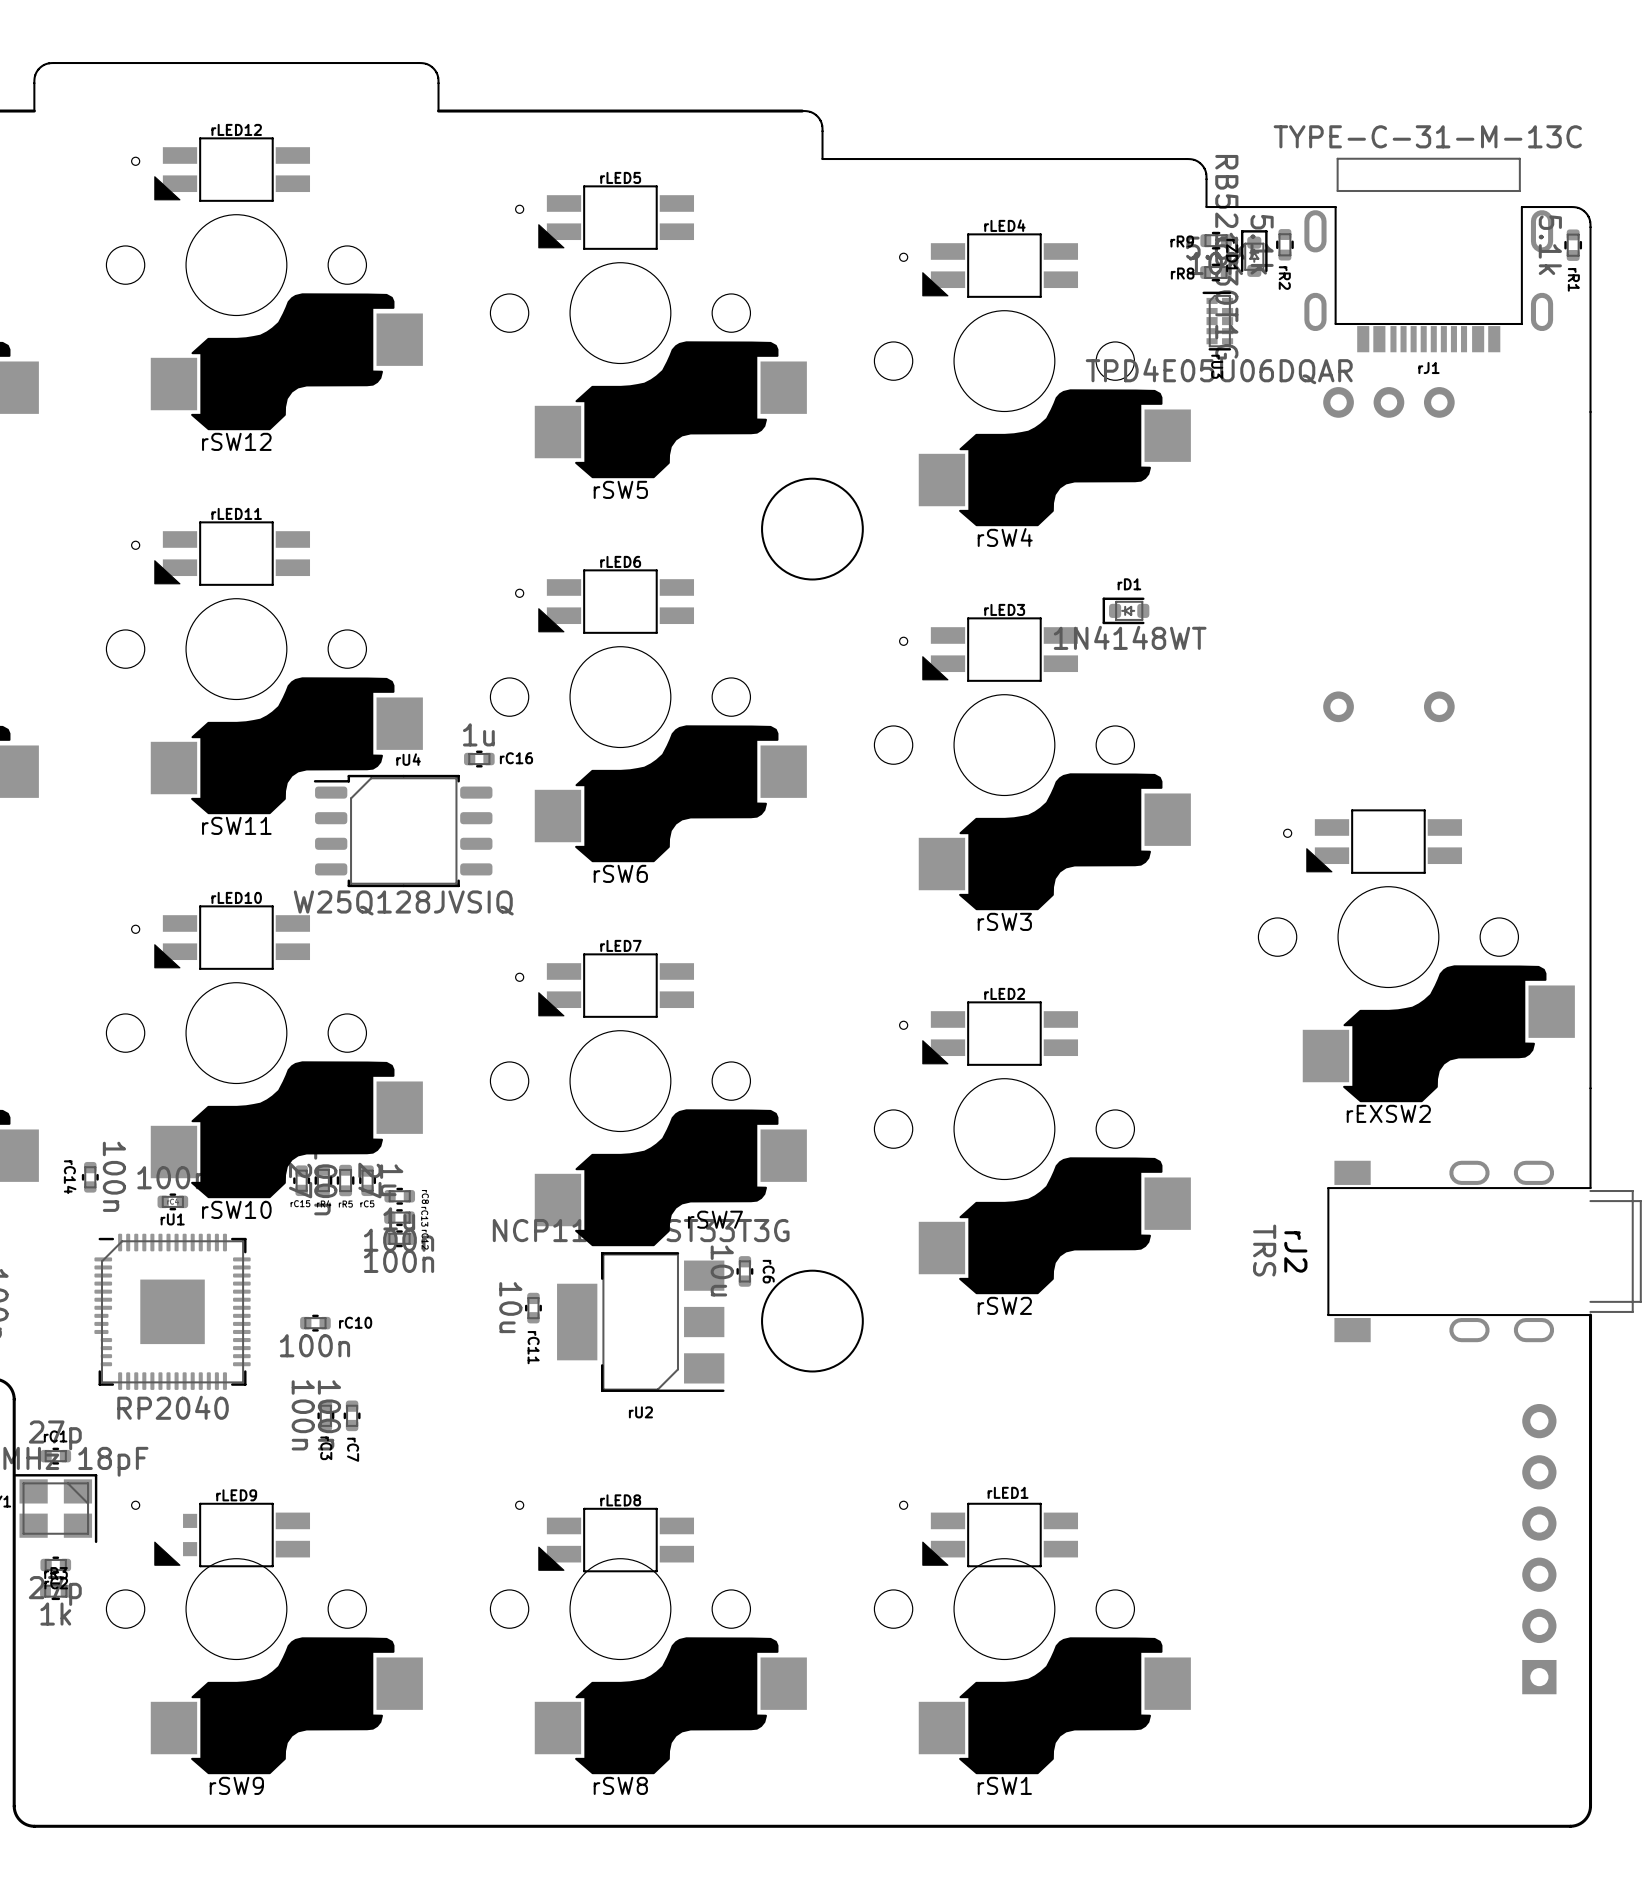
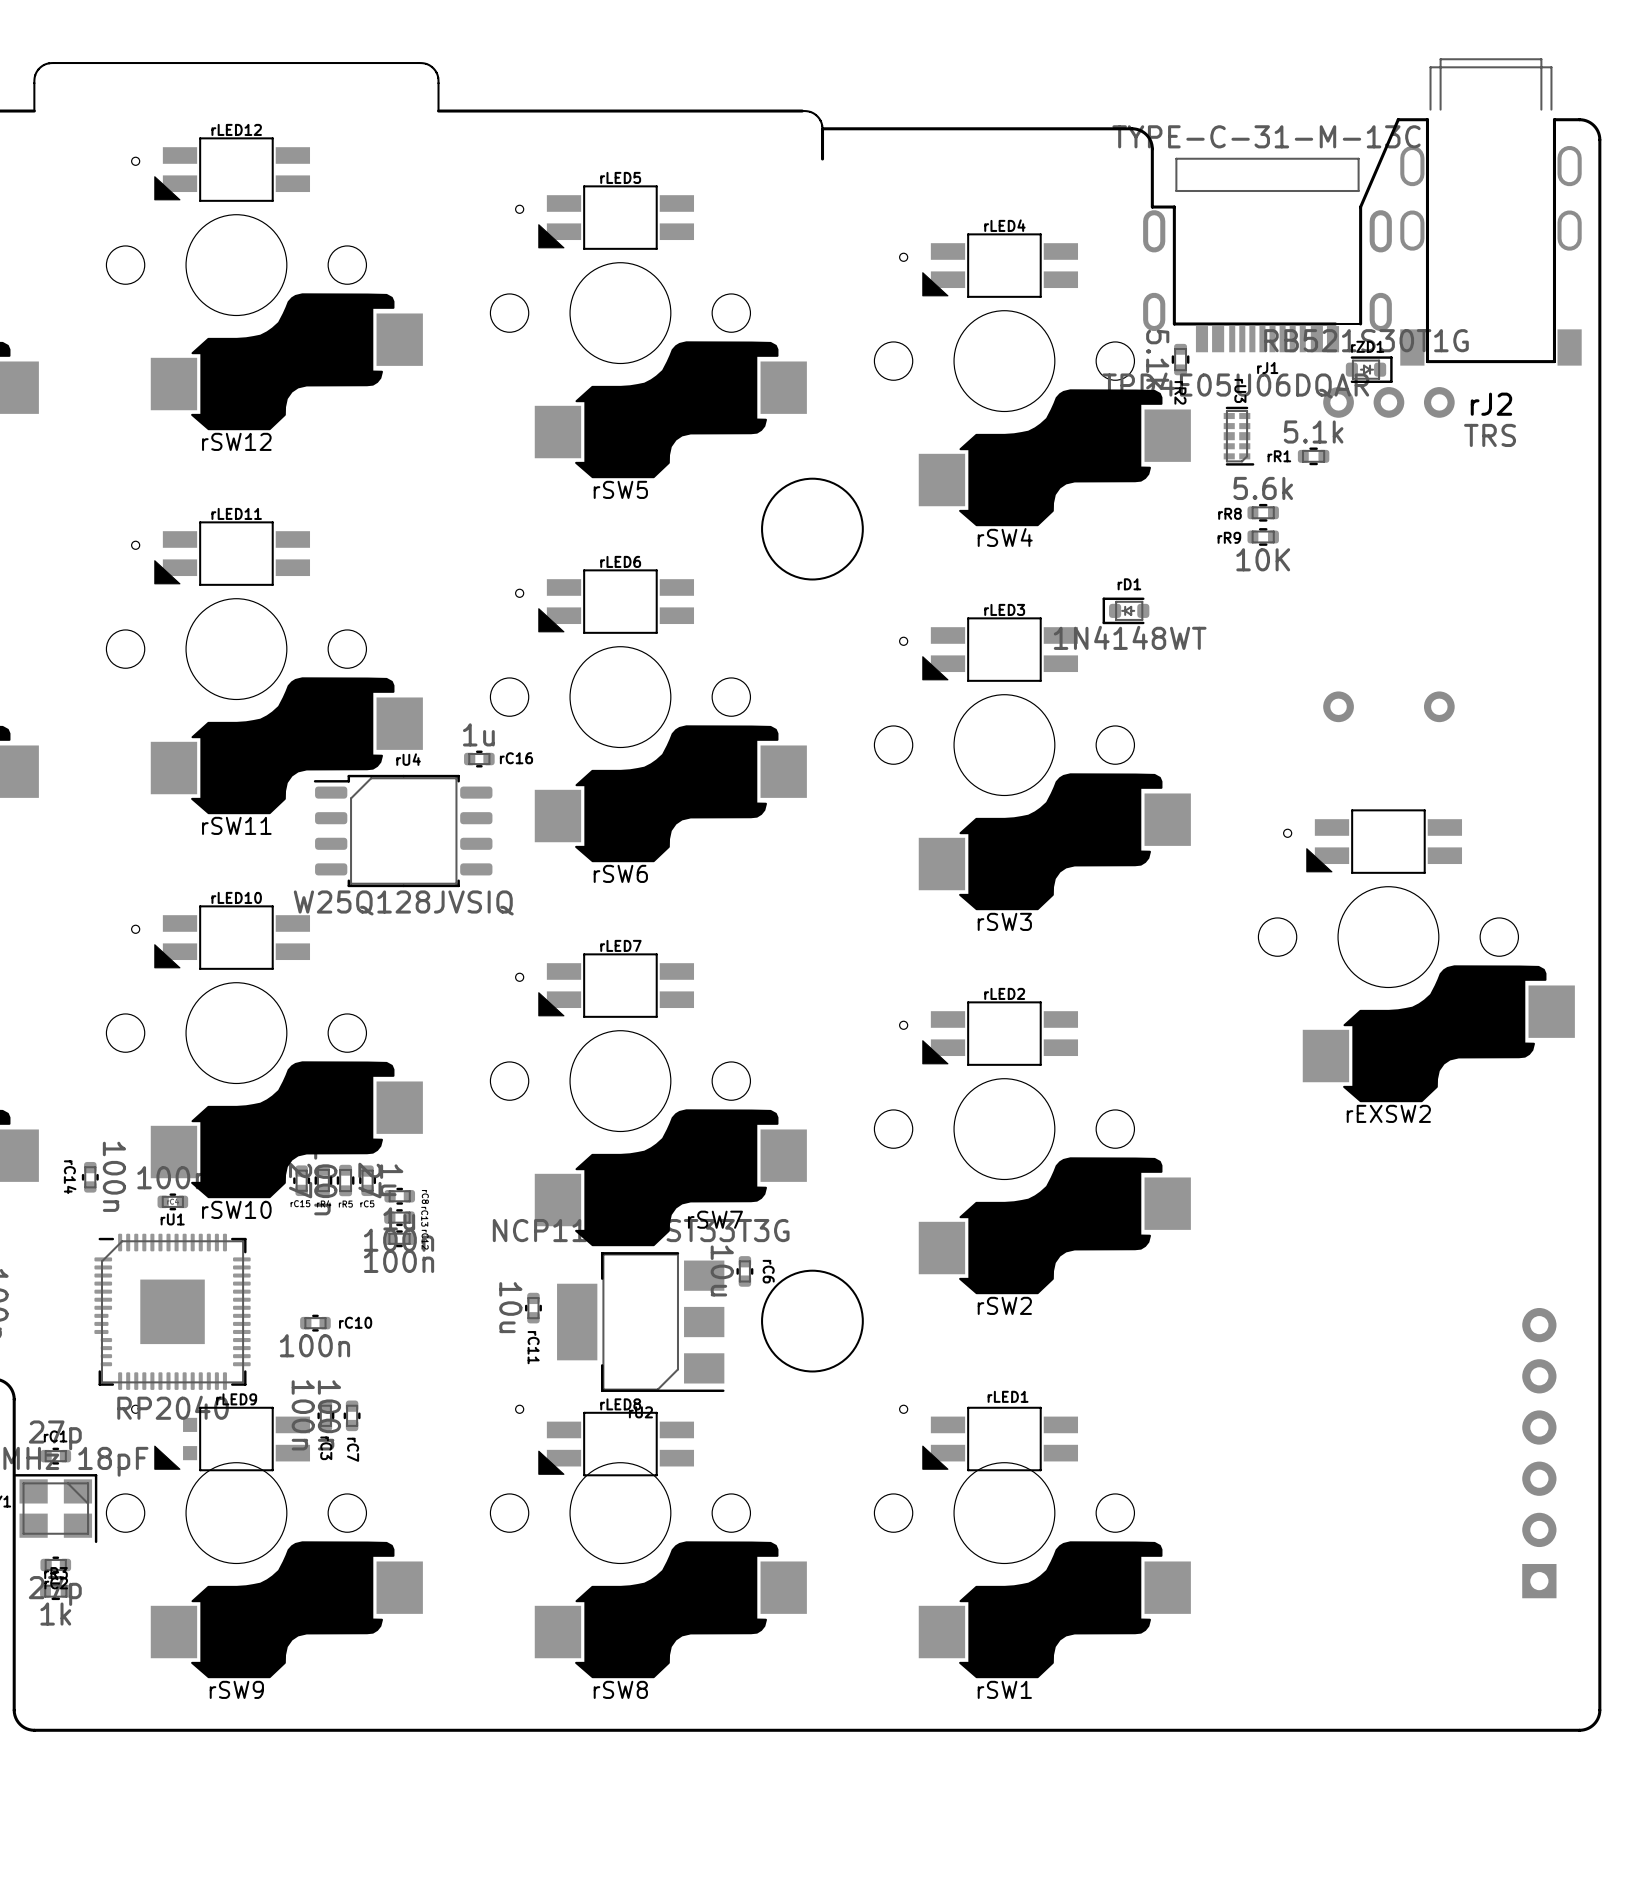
board edge: (822, 159) (1194, 159) (1201, 164) (1205, 172) (1206, 207) (1335, 207) (1335, 323) -> (822, 159) (822, 128) (1138, 129) (1147, 136) (1151, 144) (1152, 207) (1174, 207) (1174, 323) (1335, 323)
rR9 position: (1216, 240) -> (1263, 536)
rR2 position: (1284, 244) -> (1180, 359)
rR1 rotation: 0° (1573, 245) -> 90° clockwise (1313, 456)
rR1 position: (1573, 245) -> (1313, 456)
rZD1 rotation: 0° (1254, 253) -> 90° clockwise (1369, 369)
rZD1 position: (1254, 253) -> (1369, 369)
rJ1 position: (1428, 254) -> (1267, 254)
rR8 position: (1215, 272) -> (1263, 512)
rU3 rotation: 0° (1217, 321) -> 180° (1239, 436)
rU3 position: (1217, 321) -> (1239, 436)
board edge: (1360, 323) (1521, 323) (1521, 207) (1575, 207) (1583, 210) (1588, 217) (1590, 226) (1590, 1188) (1328, 1188) (1328, 1315) (1590, 1315) (1590, 1806) (1588, 1813) (1584, 1820) (1578, 1824) (1570, 1826) (31, 1826) (20, 1820) (14, 1808) (14, 1710) -> (1360, 323) (1360, 207) (1398, 119) (1427, 119) (1427, 361) (1554, 361) (1554, 119) (1584, 120) (1595, 127) (1599, 139) (1599, 1710) (1597, 1718) (1593, 1724) (1586, 1729) (1579, 1730) (34, 1730) (26, 1728) (20, 1724) (15, 1717) (14, 1710)
rJ2 rotation: 0° (1488, 1251) -> 90° counterclockwise (1490, 211)
rJ2 position: (1488, 1251) -> (1490, 211)
rLED9 position: (232, 1535) -> (232, 1439)
rLED1 position: (1000, 1535) -> (1000, 1439)
rLED8 position: (616, 1540) -> (616, 1444)
part position: (1539, 1549) -> (1539, 1453)
rSW9 position: (264, 1637) -> (264, 1541)
rSW8 position: (648, 1637) -> (648, 1541)
rSW1 position: (1032, 1637) -> (1032, 1541)

